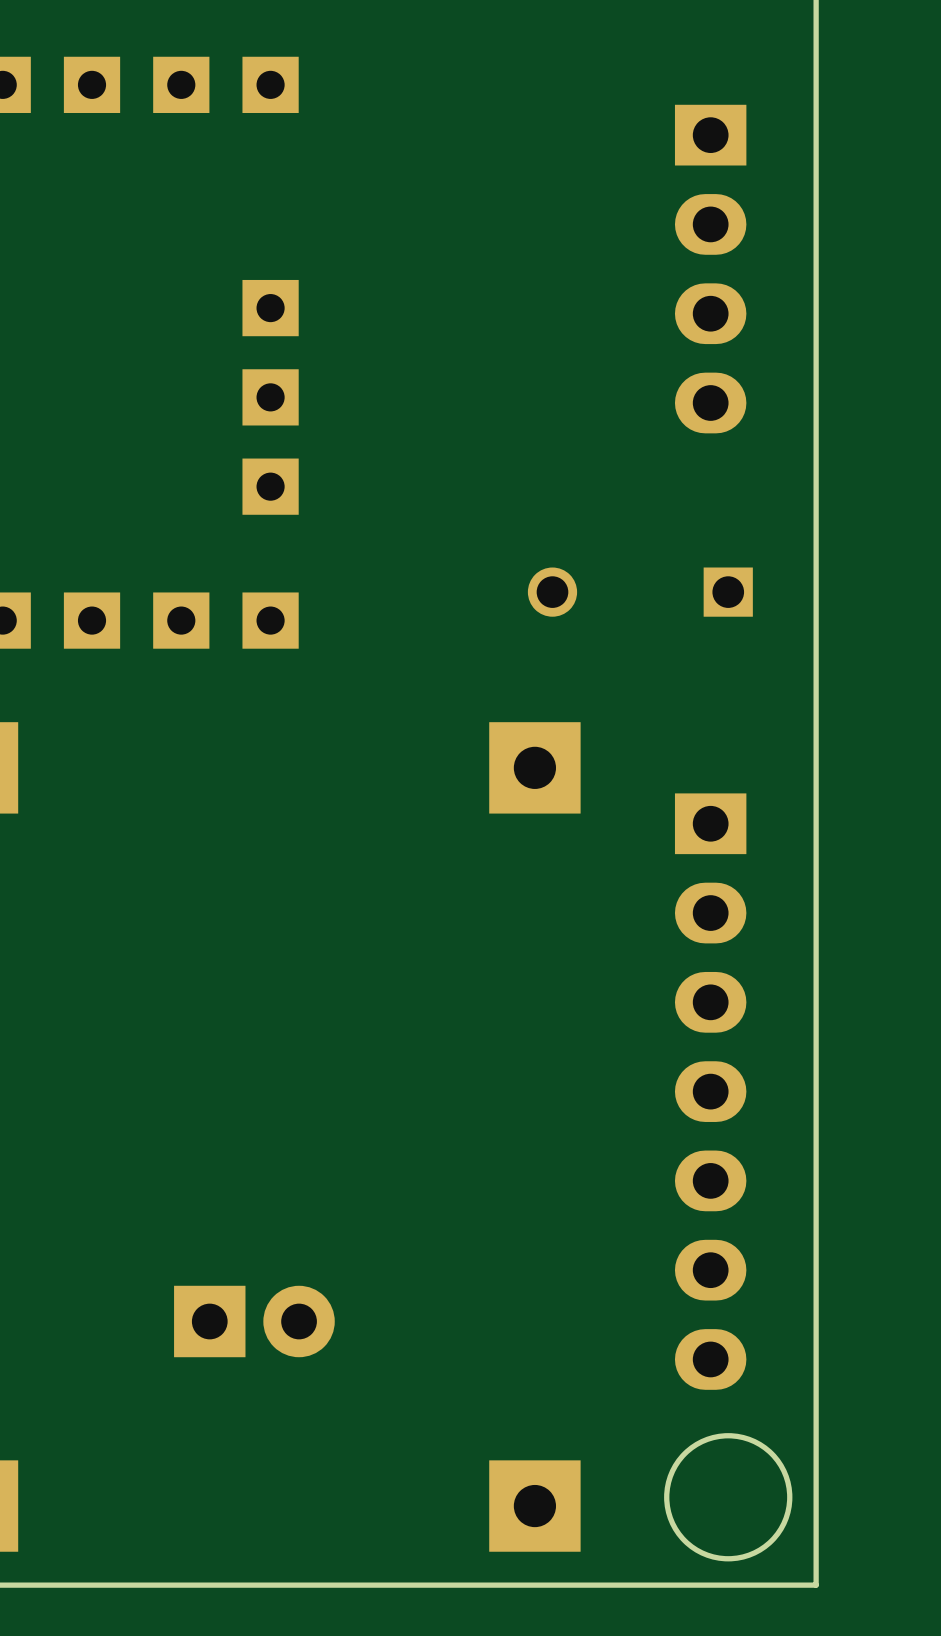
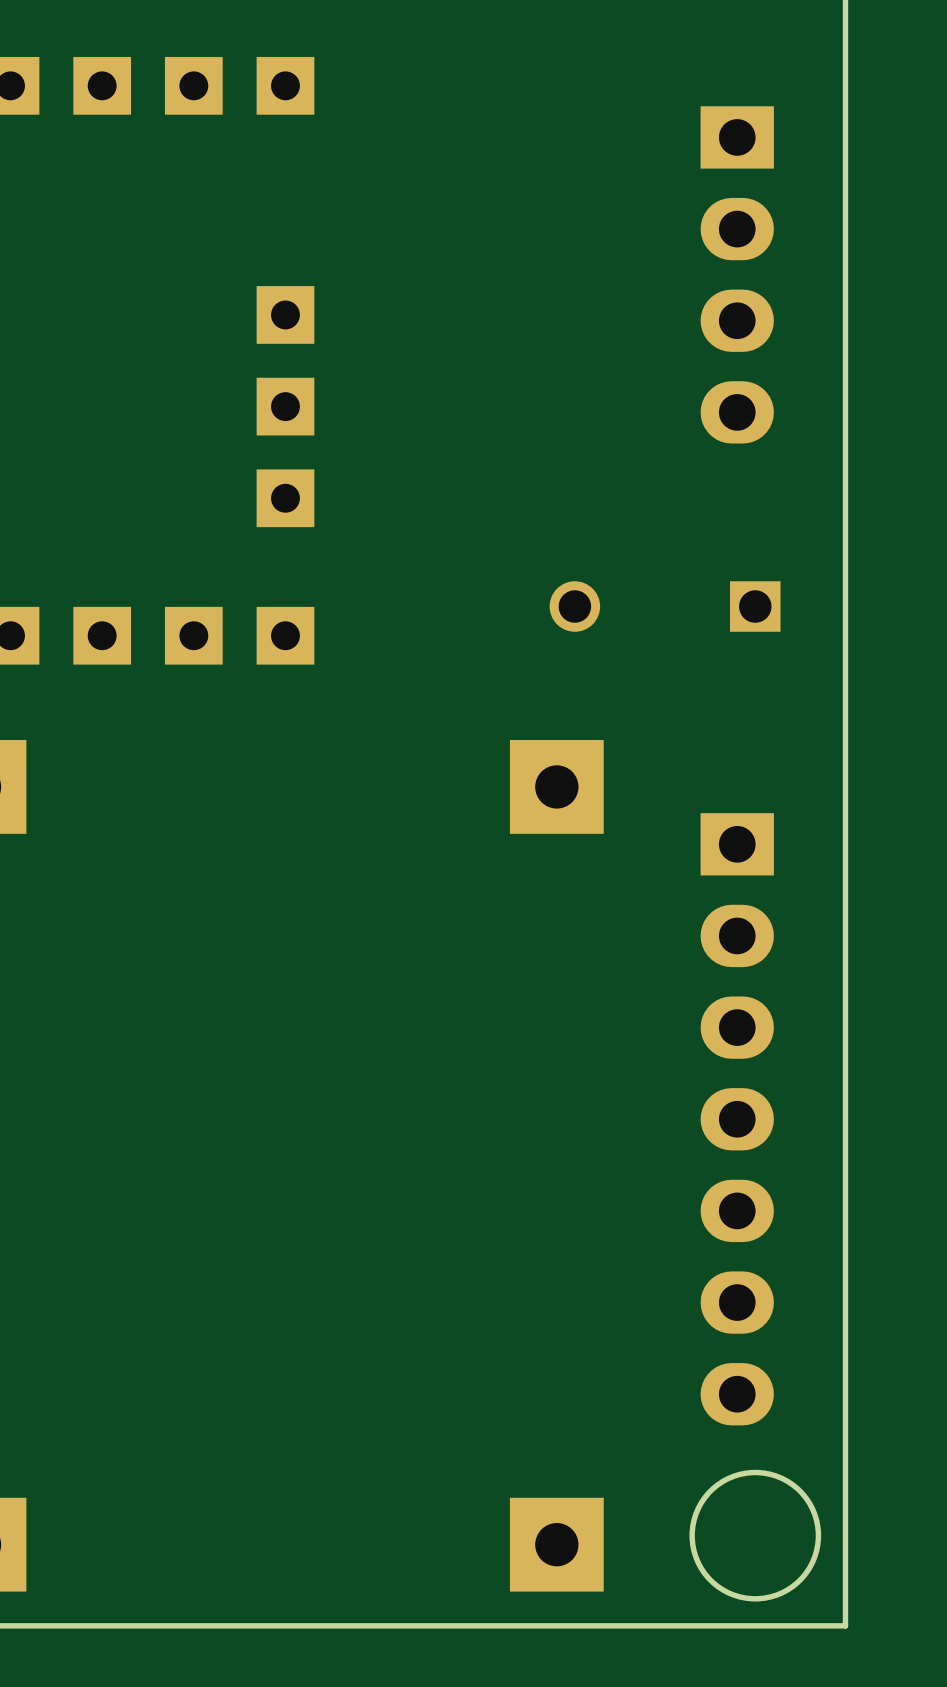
part: (254, 1321) -> none

